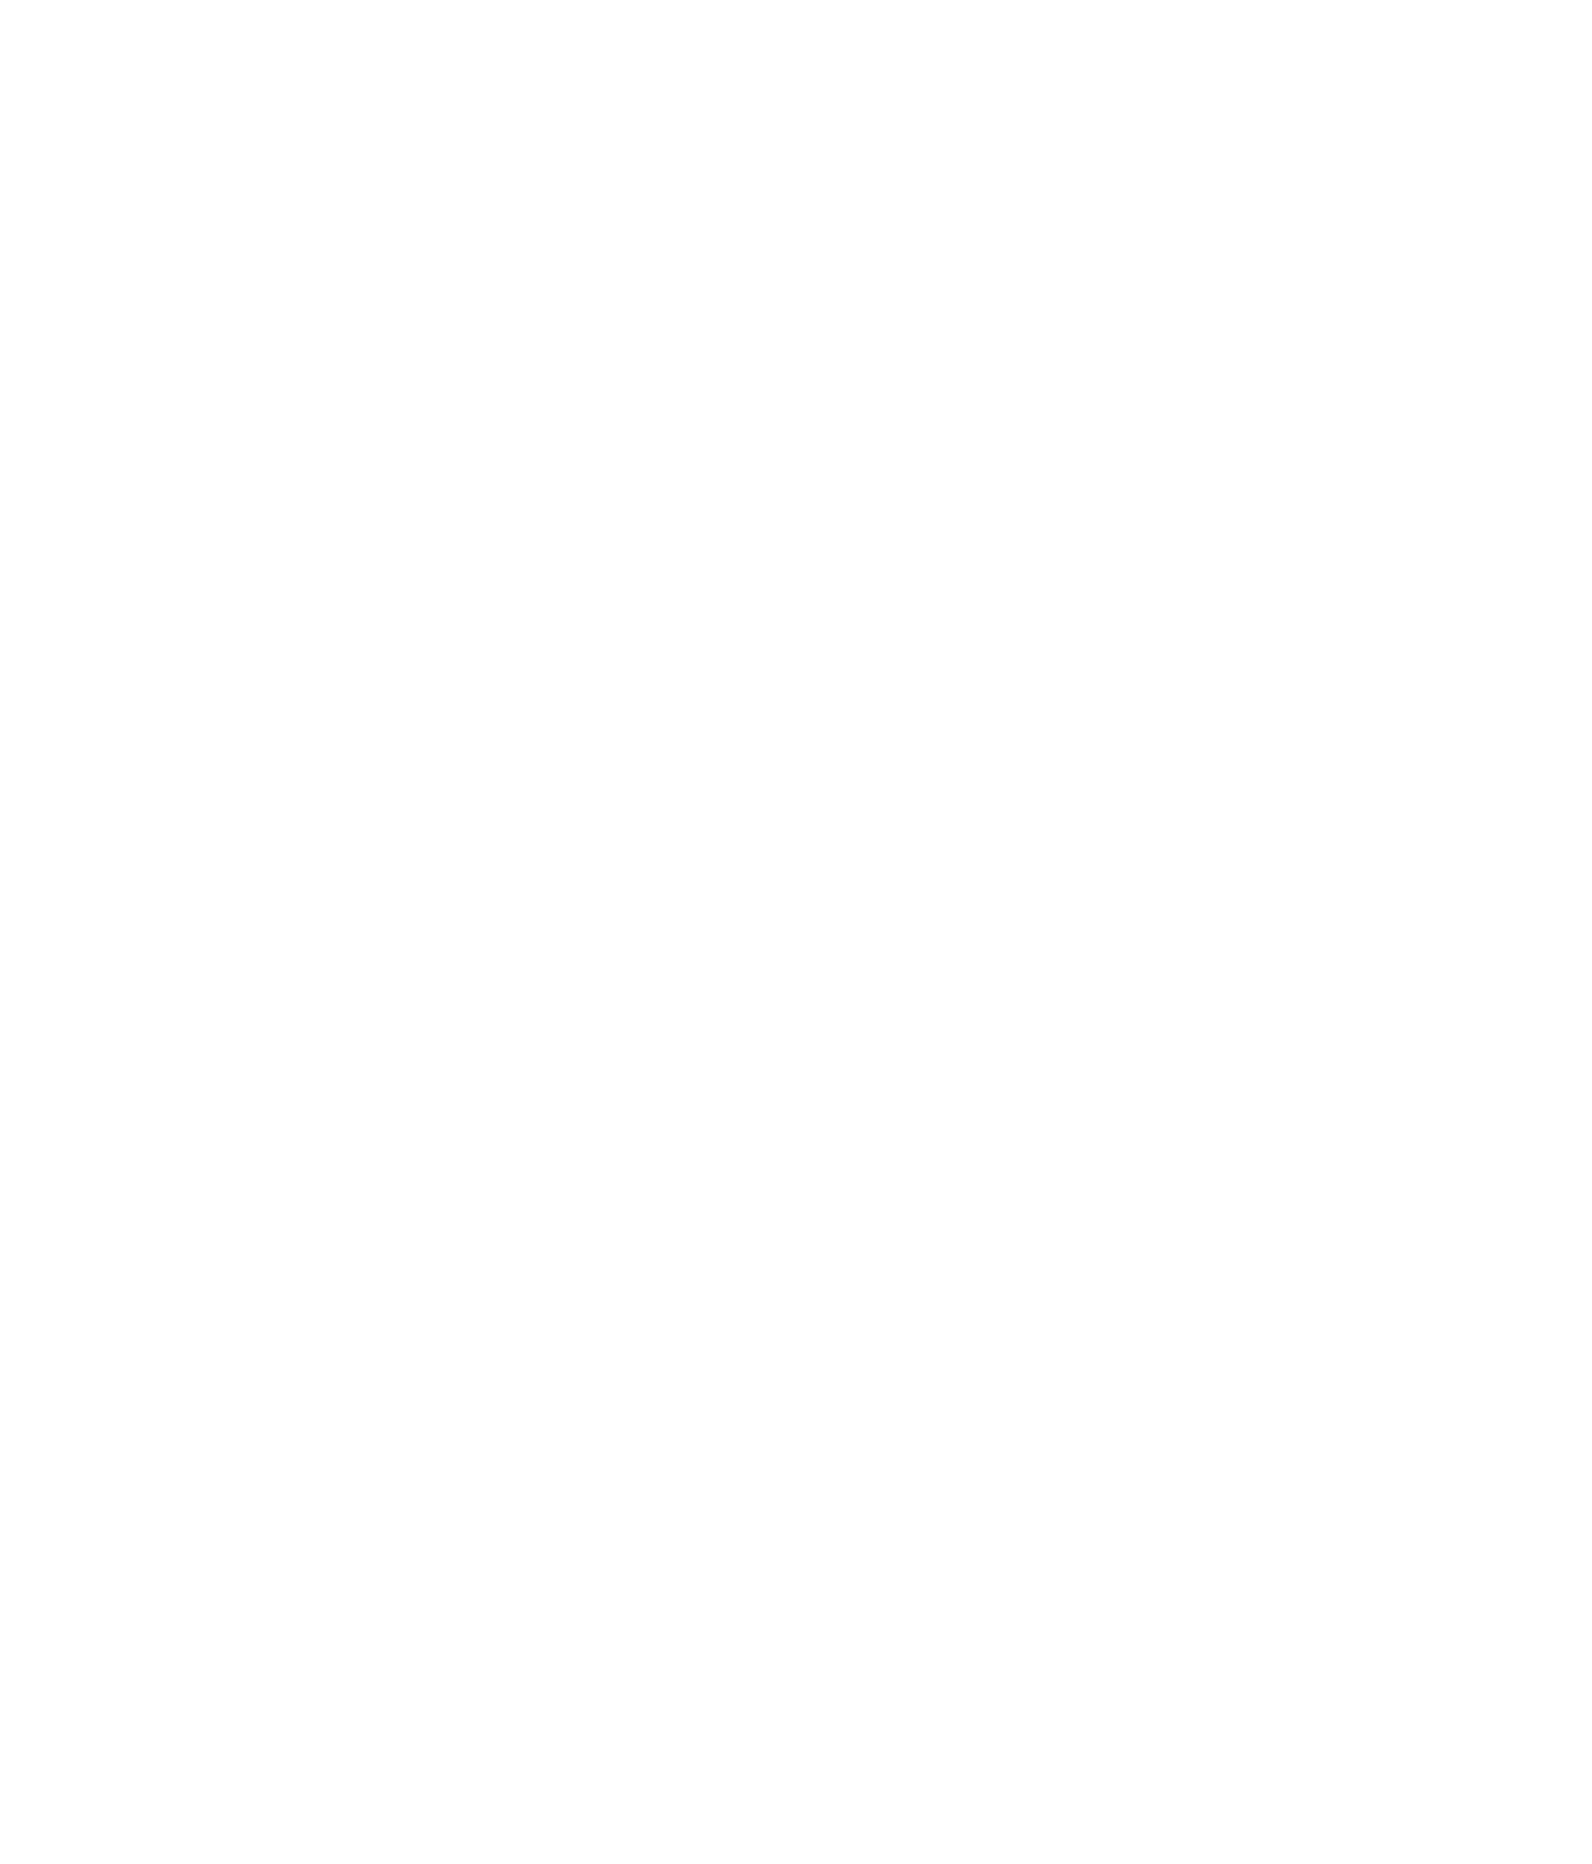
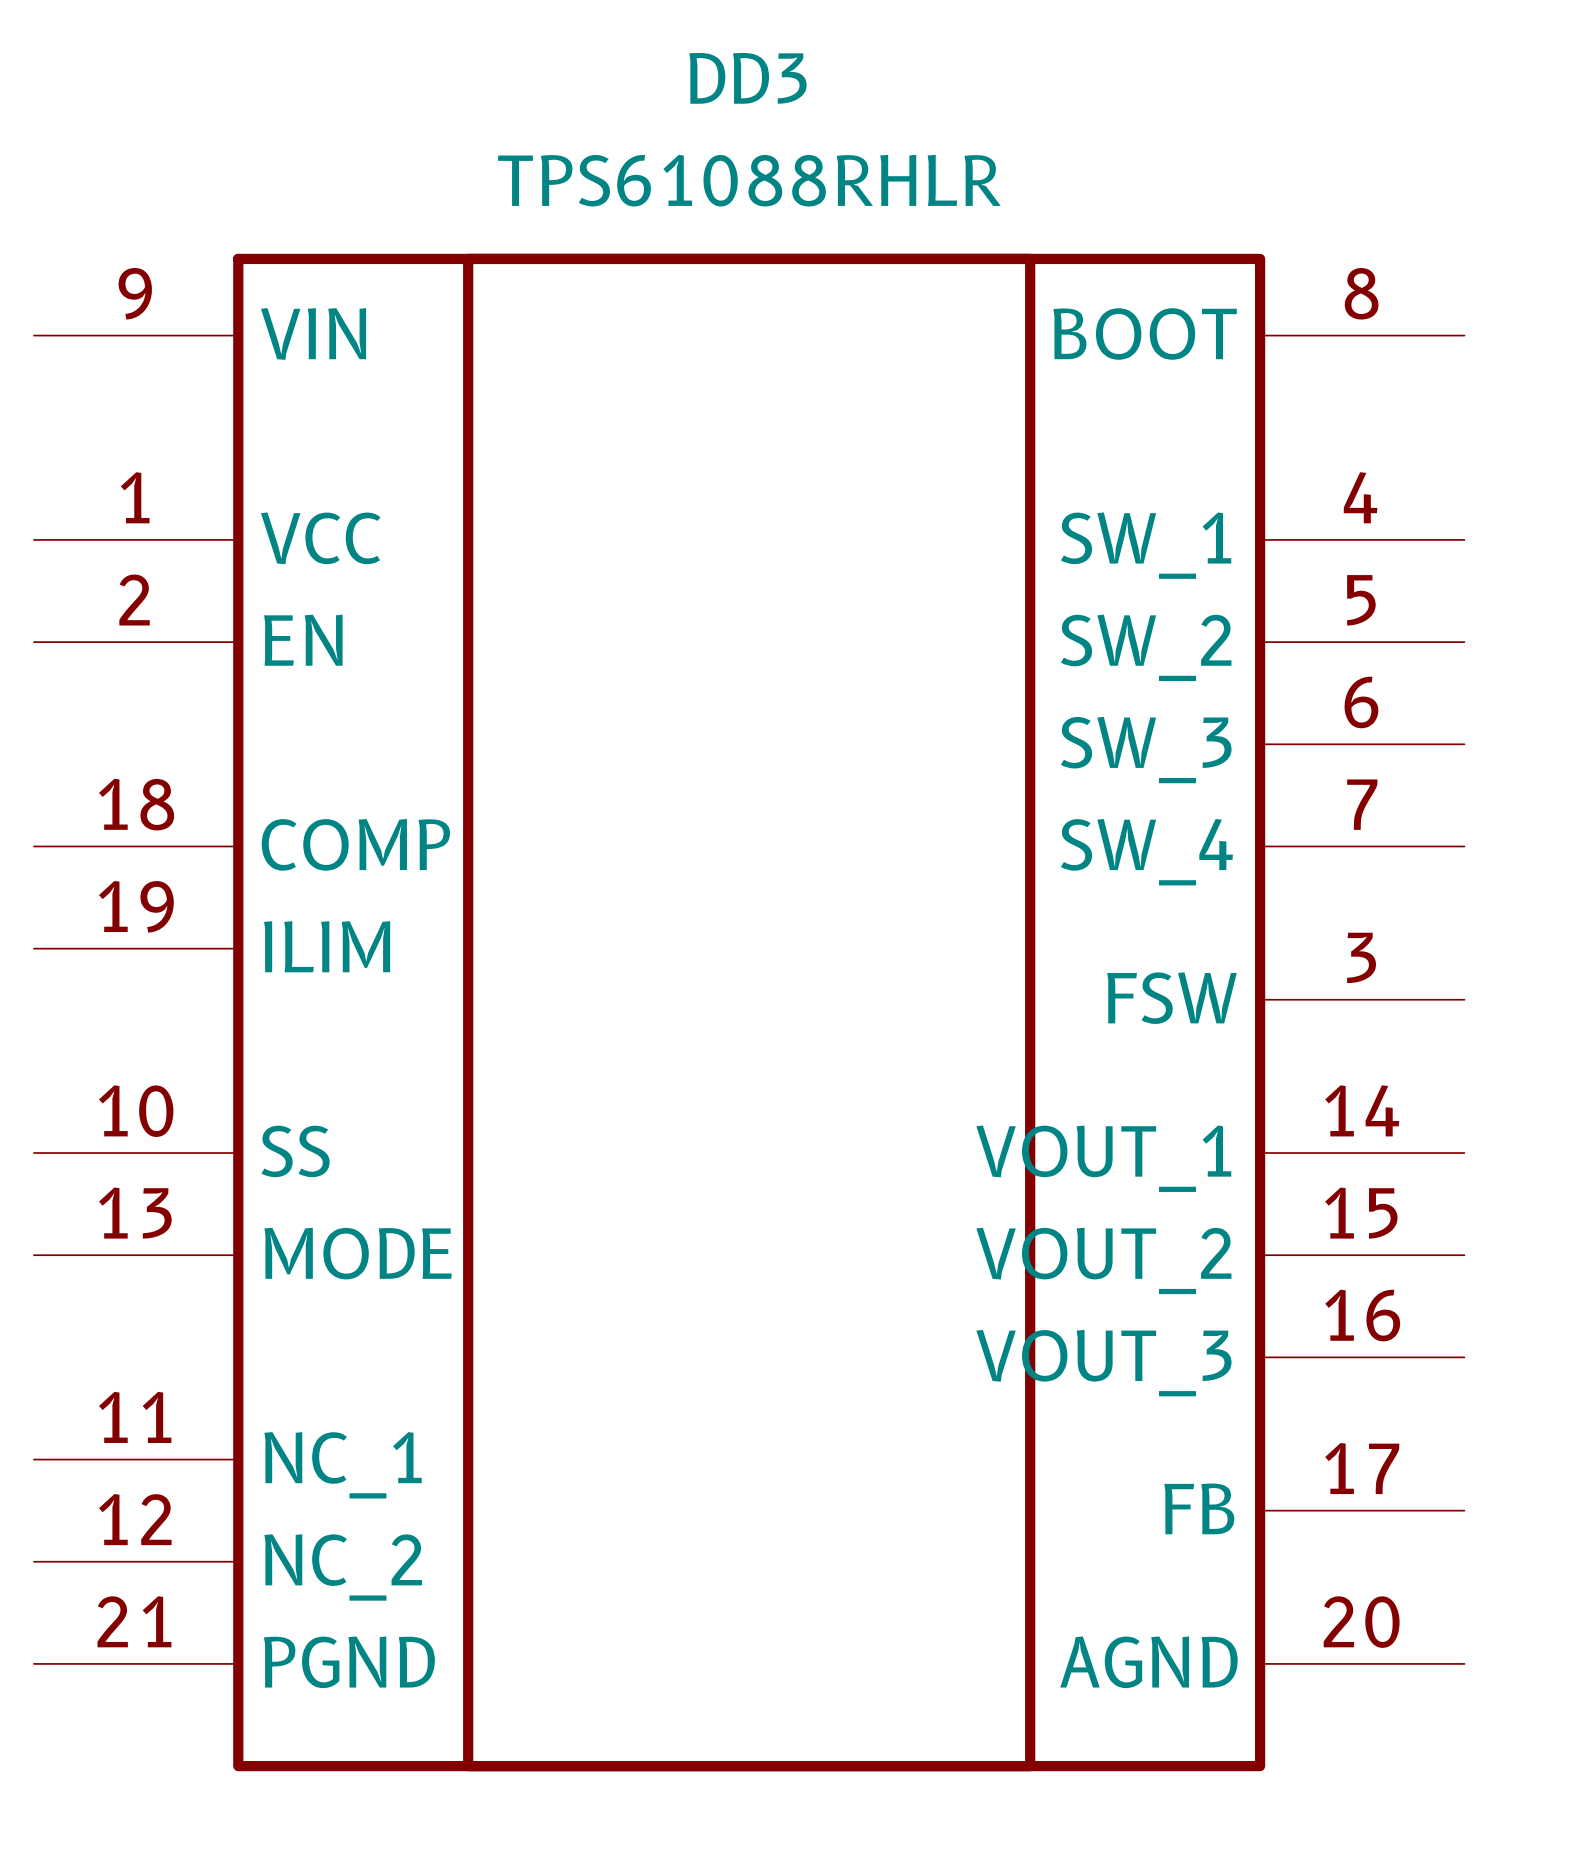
DD3: none -> TPS61088RHLR (749, 1012)

